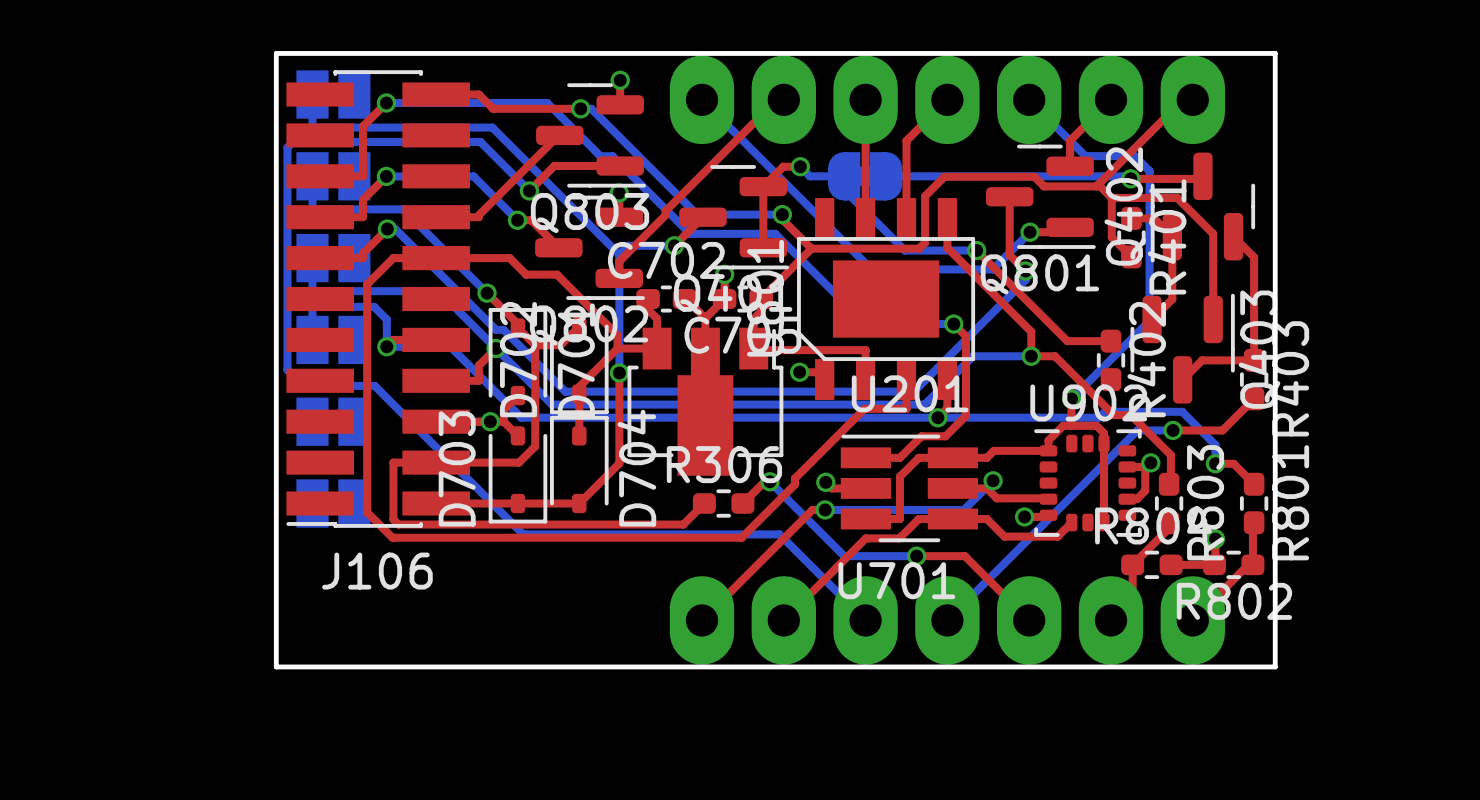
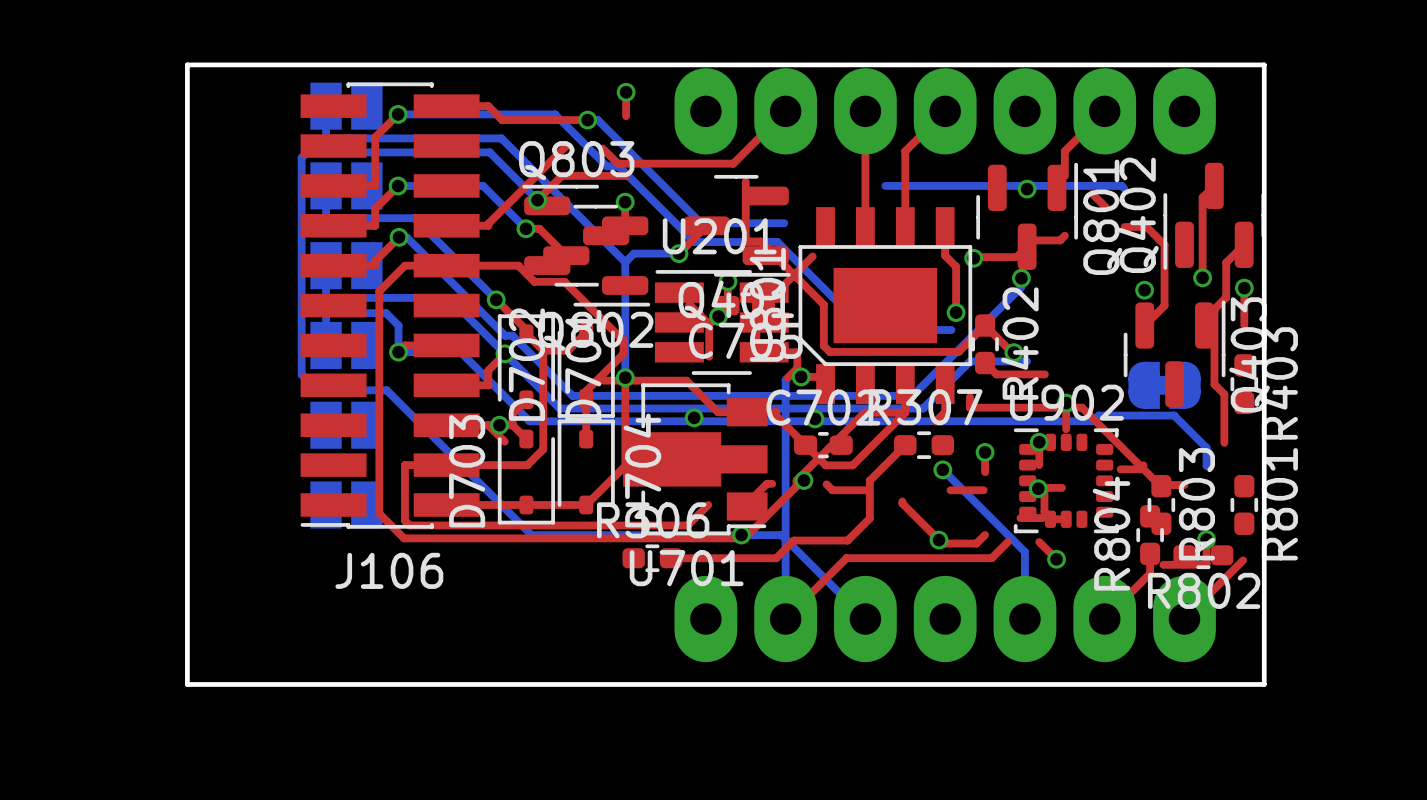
board edge: (276, 53) (1275, 53) (1275, 666) (276, 666) (276, 53) -> (187, 64) (187, 684) (1264, 684) (1264, 64) (187, 64)
bottom track: (702, 99) (871, 269) (992, 269) (1030, 232) -> none
top track: (783, 99) (776, 99) (665, 211) (665, 215) (619, 261) (619, 278) -> (785, 111) (733, 163) (617, 163) (602, 148)
bottom track: (1029, 99) (1085, 156) (1134, 156) (1149, 171) (1149, 320) (1071, 399) -> none
top track: (1192, 99) (1183, 99) (1096, 186) (1044, 186) (1034, 176) (944, 176) (925, 196) (925, 242) (919, 248) (811, 248) (782, 219) (782, 214) -> none
Q803 rotation: 0° (590, 135) -> 180° (575, 235)
Q803 position: (590, 135) -> (575, 235)
top track: (800, 166) (783, 166) (763, 186) (763, 247) -> none
bottom track: (800, 166) (809, 176) (844, 176) (844, 189) (904, 250) (976, 250) -> none
via: (800, 166) -> none
top track: none -> (745, 181) (745, 241) (760, 241) (823, 304) (823, 346) (829, 351) (958, 351) (985, 325) (1013, 352)
part position: (865, 176) -> (1164, 385)
top track: (1202, 176) (1200, 178) (1130, 178) -> none
top track: none -> (1214, 185) (1202, 197) (1202, 277)
via: (1130, 178) -> none
via: none -> (1027, 189)
top track: (1009, 196) (1009, 255) (1025, 271) -> none
Q801 rotation: 0° (1040, 196) -> 90° counterclockwise (1027, 216)
Q402 position: (1202, 207) -> (1214, 216)
via: (782, 214) -> none
via: (1030, 232) -> none
top track: (1233, 236) (1254, 257) (1254, 281) -> none
top track: none -> (1244, 244) (1226, 262) (1226, 297) (1214, 309) (1214, 384) (1224, 394) (1224, 442)
R401: (1131, 237) -> none
top track: none -> (1027, 246) (1016, 257) (978, 257)
top track: (976, 250) (1067, 341) (1110, 341) -> none
top track: (1131, 256) (1111, 237) (1111, 197) (1177, 197) (1213, 233) (1213, 319) -> none
top track: (958, 259) (1031, 331) (1031, 356) (1055, 356) (1113, 415) (1130, 415) (1170, 455) (1170, 482) (1169, 484) -> (956, 266) (956, 312)
via: none -> (1202, 277)
via: none -> (1244, 288)
via: none -> (1144, 290)
top track: (648, 299) (648, 309) (657, 318) (657, 348) (617, 348) -> none
C702 position: (666, 299) -> (823, 445)
via: none -> (718, 316)
top track: (1254, 319) (1254, 360) (1202, 360) (1182, 379) -> none
top track: (953, 324) (965, 336) (965, 415) (945, 436) (921, 436) (899, 457) (865, 457) -> none
via position: (953, 324) -> (956, 312)
top track: (753, 346) (757, 350) (865, 350) (865, 379) -> none
top track: none -> (764, 352) (797, 352) (797, 368) (787, 377)
via position: (1031, 356) -> (1013, 352)
top track: none -> (985, 363) (996, 374) (1044, 374)
R402 position: (1110, 360) -> (985, 344)
bottom track: none -> (787, 377) (785, 379) (785, 619)
top track: none -> (603, 380) (686, 380) (718, 412) (776, 412) (776, 415) (825, 465) (852, 465) (905, 412)
top track: none -> (970, 397) (970, 407) (1082, 407) (1159, 485) (1184, 485)
U201 name position: U201 (910, 393) -> U201 (719, 236)
top track: (1254, 398) (1222, 430) (1172, 430) -> none
U701 rotation: 0° (705, 401) -> 90° clockwise (695, 459)
via: none -> (694, 417)
via: none -> (815, 418)
via: (937, 417) -> none
top track: none -> (488, 425) (504, 441)
bottom track: (1172, 430) (1137, 430) (947, 620) -> none
via: (1172, 430) -> none
top track: none -> (1039, 442) (1039, 465)
via: none -> (1039, 442)
top track: none -> (905, 445) (869, 480) (869, 518) (847, 540) (793, 540) (776, 558) (671, 558)
R307: none -> (924, 445)
top track: none -> (985, 452) (985, 472)
via: none -> (985, 452)
via: (1150, 462) -> none
top track: (1215, 463) (1233, 463) (1254, 484) -> none
via: (1215, 463) -> none
top track: (1145, 466) (1145, 490) (1136, 499) (1127, 499) -> none
bottom track: none -> (942, 469) (1024, 551) (1024, 619)
via: none -> (942, 469)
via: none -> (804, 480)
top track: (993, 480) (986, 488) (996, 498) (1048, 499) -> none
bottom track: (993, 480) (963, 509) (825, 509) -> none
via: (993, 480) -> none
bottom track: (769, 481) (844, 556) (916, 556) -> none
via: (769, 481) -> none
via: (825, 482) -> none
U902 position: (1087, 483) -> (1066, 480)
top track: none -> (1062, 487) (1044, 488)
via: none -> (1038, 488)
top track: none -> (1044, 488) (1044, 511) (1051, 519) (1062, 519)
U201 position: (909, 488) -> (721, 322)
top track: none -> (902, 501) (942, 543) (976, 543) (985, 534)
R306 position: (723, 503) -> (652, 558)
top track: (825, 509) (812, 509) (702, 620) -> none
via: (825, 509) -> none
via: (1024, 516) -> none
top track: (865, 519) (899, 519) (899, 476) (918, 457) (986, 457) (993, 450) (1048, 450) (1048, 440) (1063, 425) (1096, 425) (1104, 433) (1104, 522) -> none
top track: (1071, 522) (1057, 536) (1004, 536) (986, 519) (918, 519) (899, 538) (865, 538) (846, 558) -> (1007, 542) (991, 558) (846, 558)
top track: (1169, 522) (1169, 528) (1132, 564) (1132, 598) -> (1150, 553) (1150, 573) (1125, 597)
top track: (1254, 522) (1252, 564) -> none
via: none -> (741, 535)
top track: none -> (1039, 542) (1056, 559)
top track: (916, 556) (964, 556) (1029, 620) -> none
via position: (916, 556) -> (939, 540)
via: none -> (1056, 559)
R804 rotation: 0° (1151, 564) -> 90° clockwise (1150, 535)
R802 position: (1233, 564) -> (1203, 555)
U701 name position: U701 (896, 580) -> U701 (686, 568)

